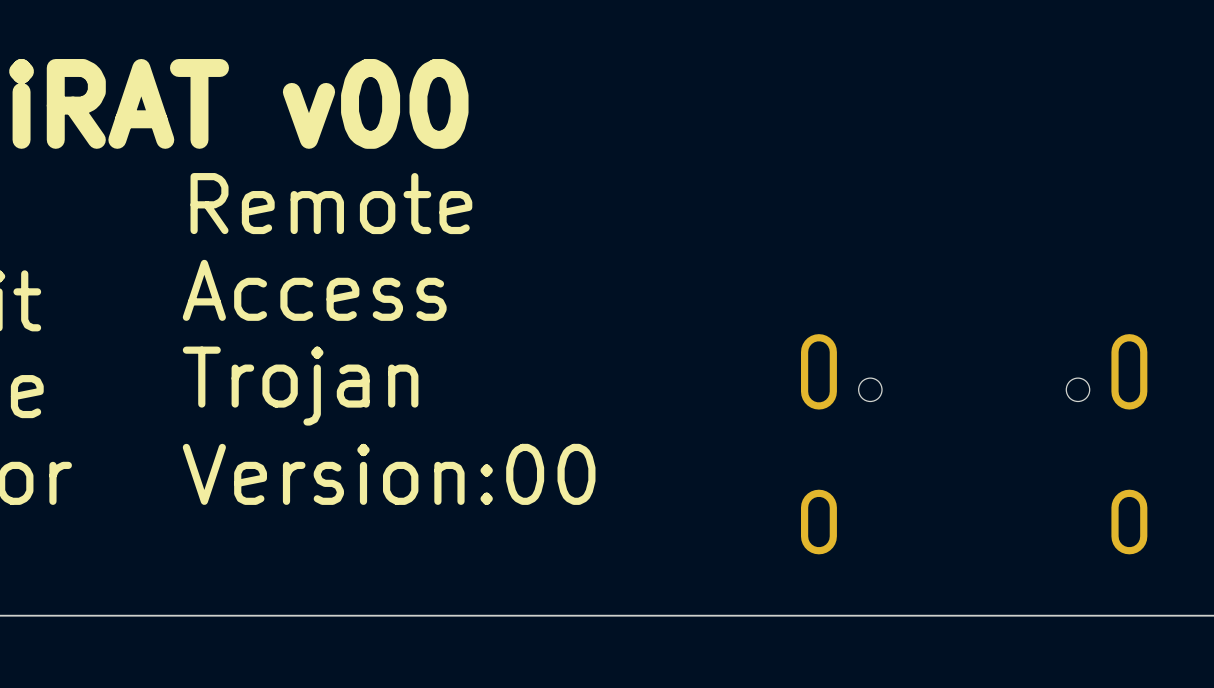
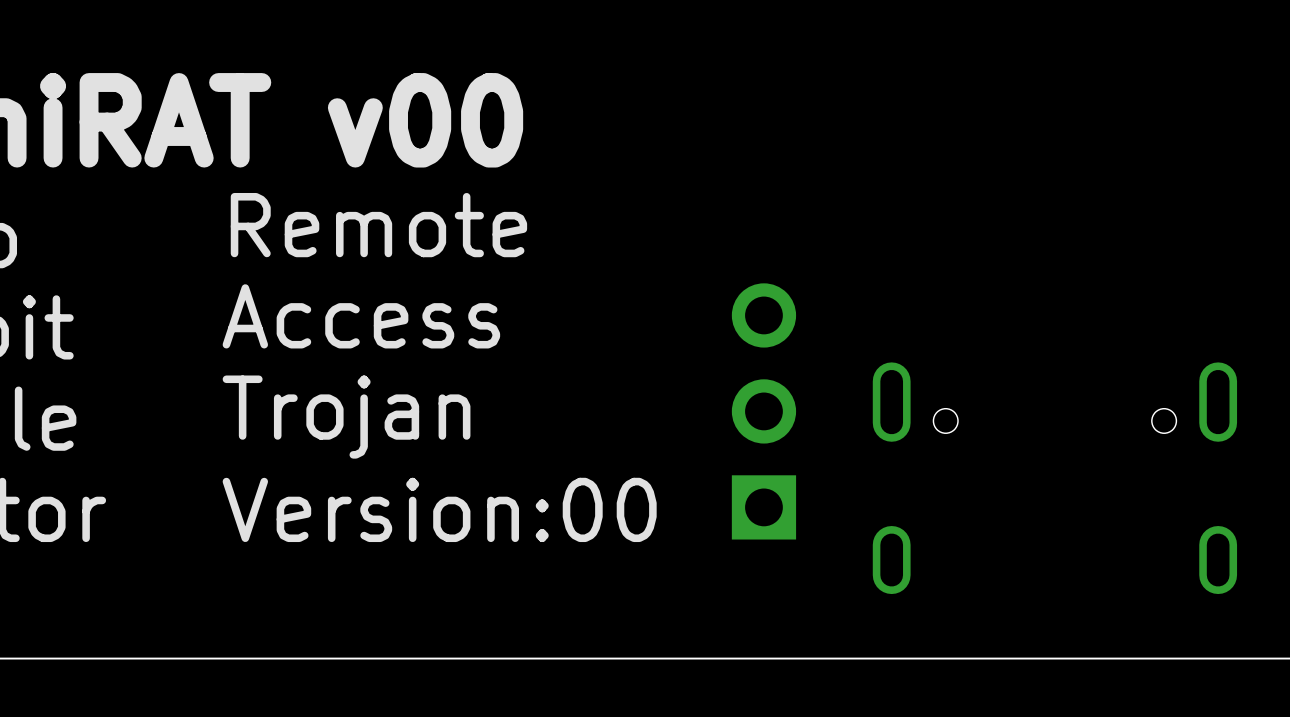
part: none -> (763, 411)

